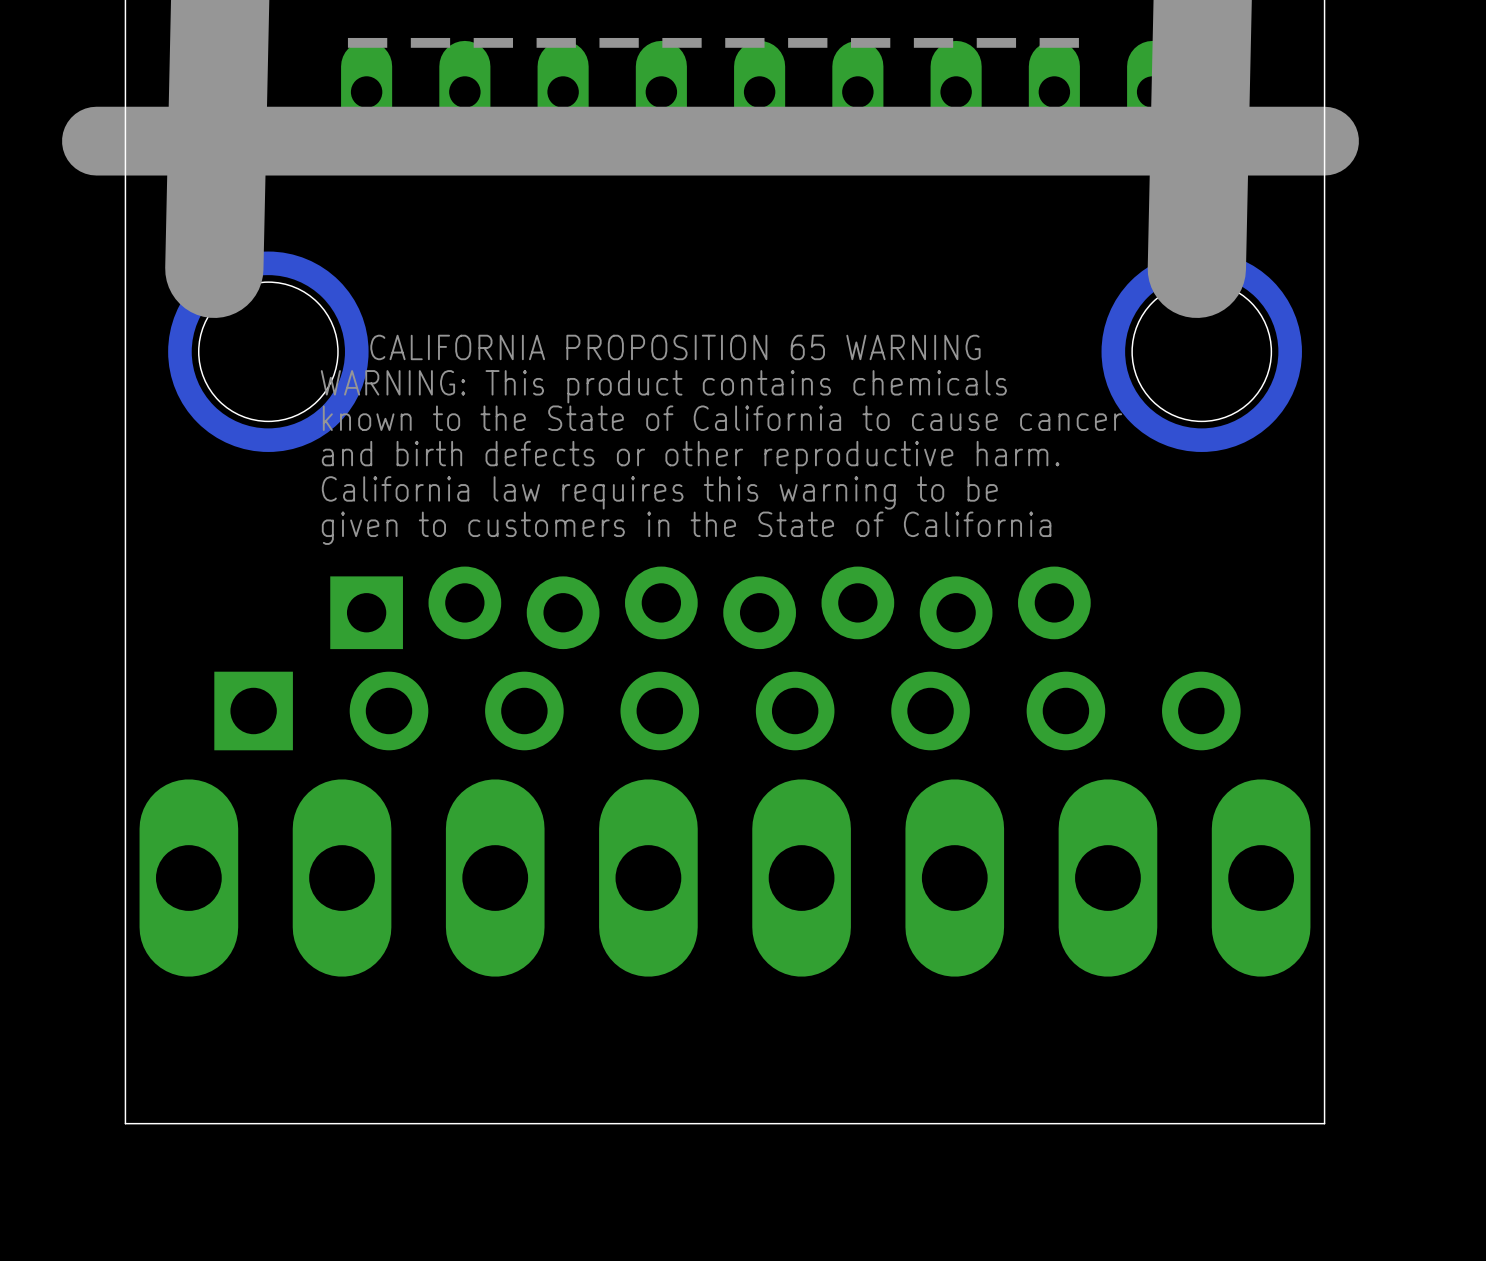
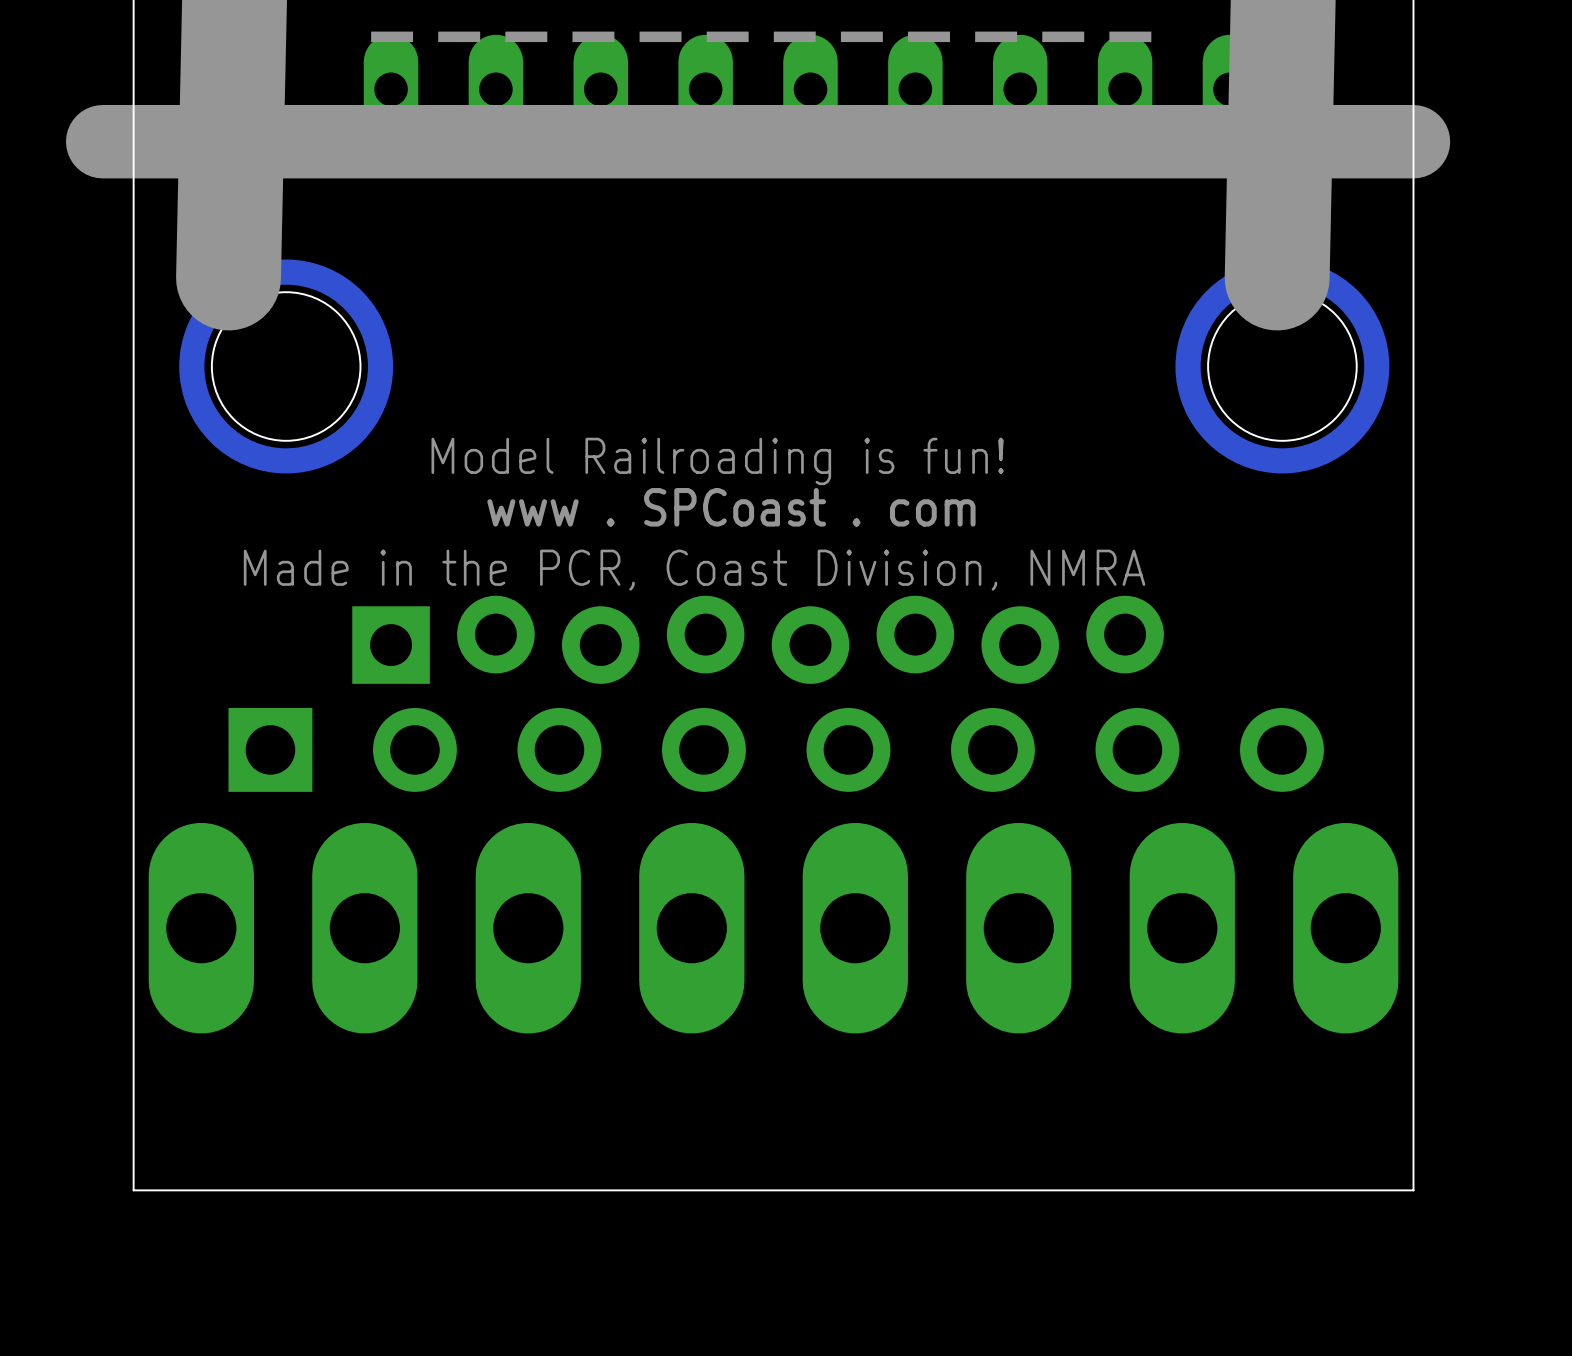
drawing: [320, 334, 1123, 545] -> none
text: none -> Model Railroading is fun! (717, 461)
text: none -> www . SPCoast . com (731, 507)
text: none -> Made in the PCR, Coast Division, NMRA (694, 570)

